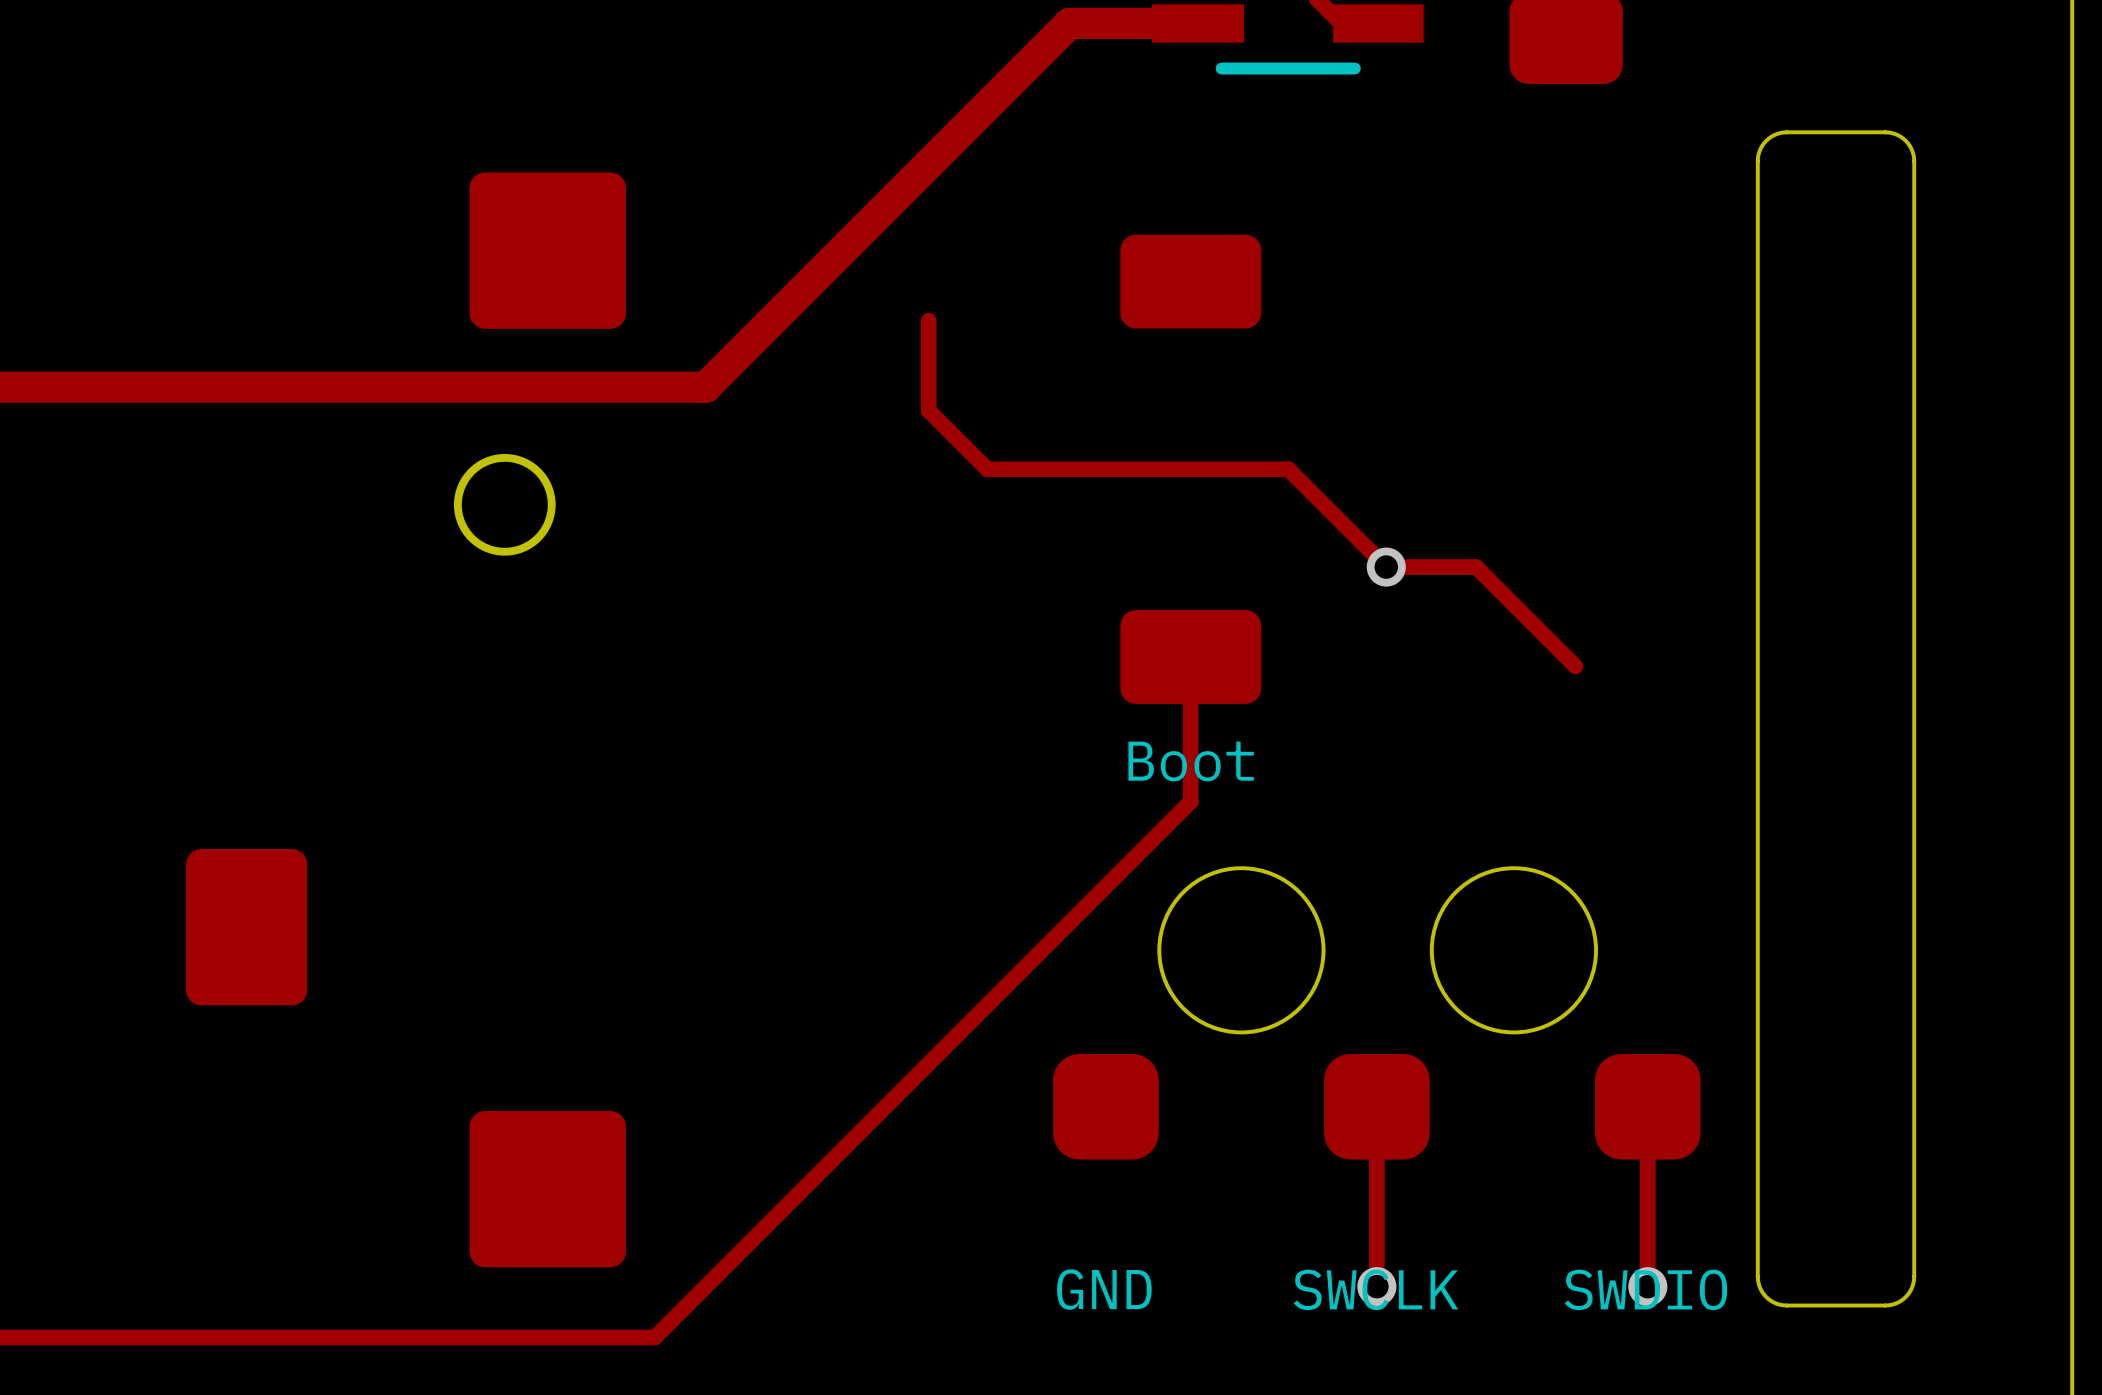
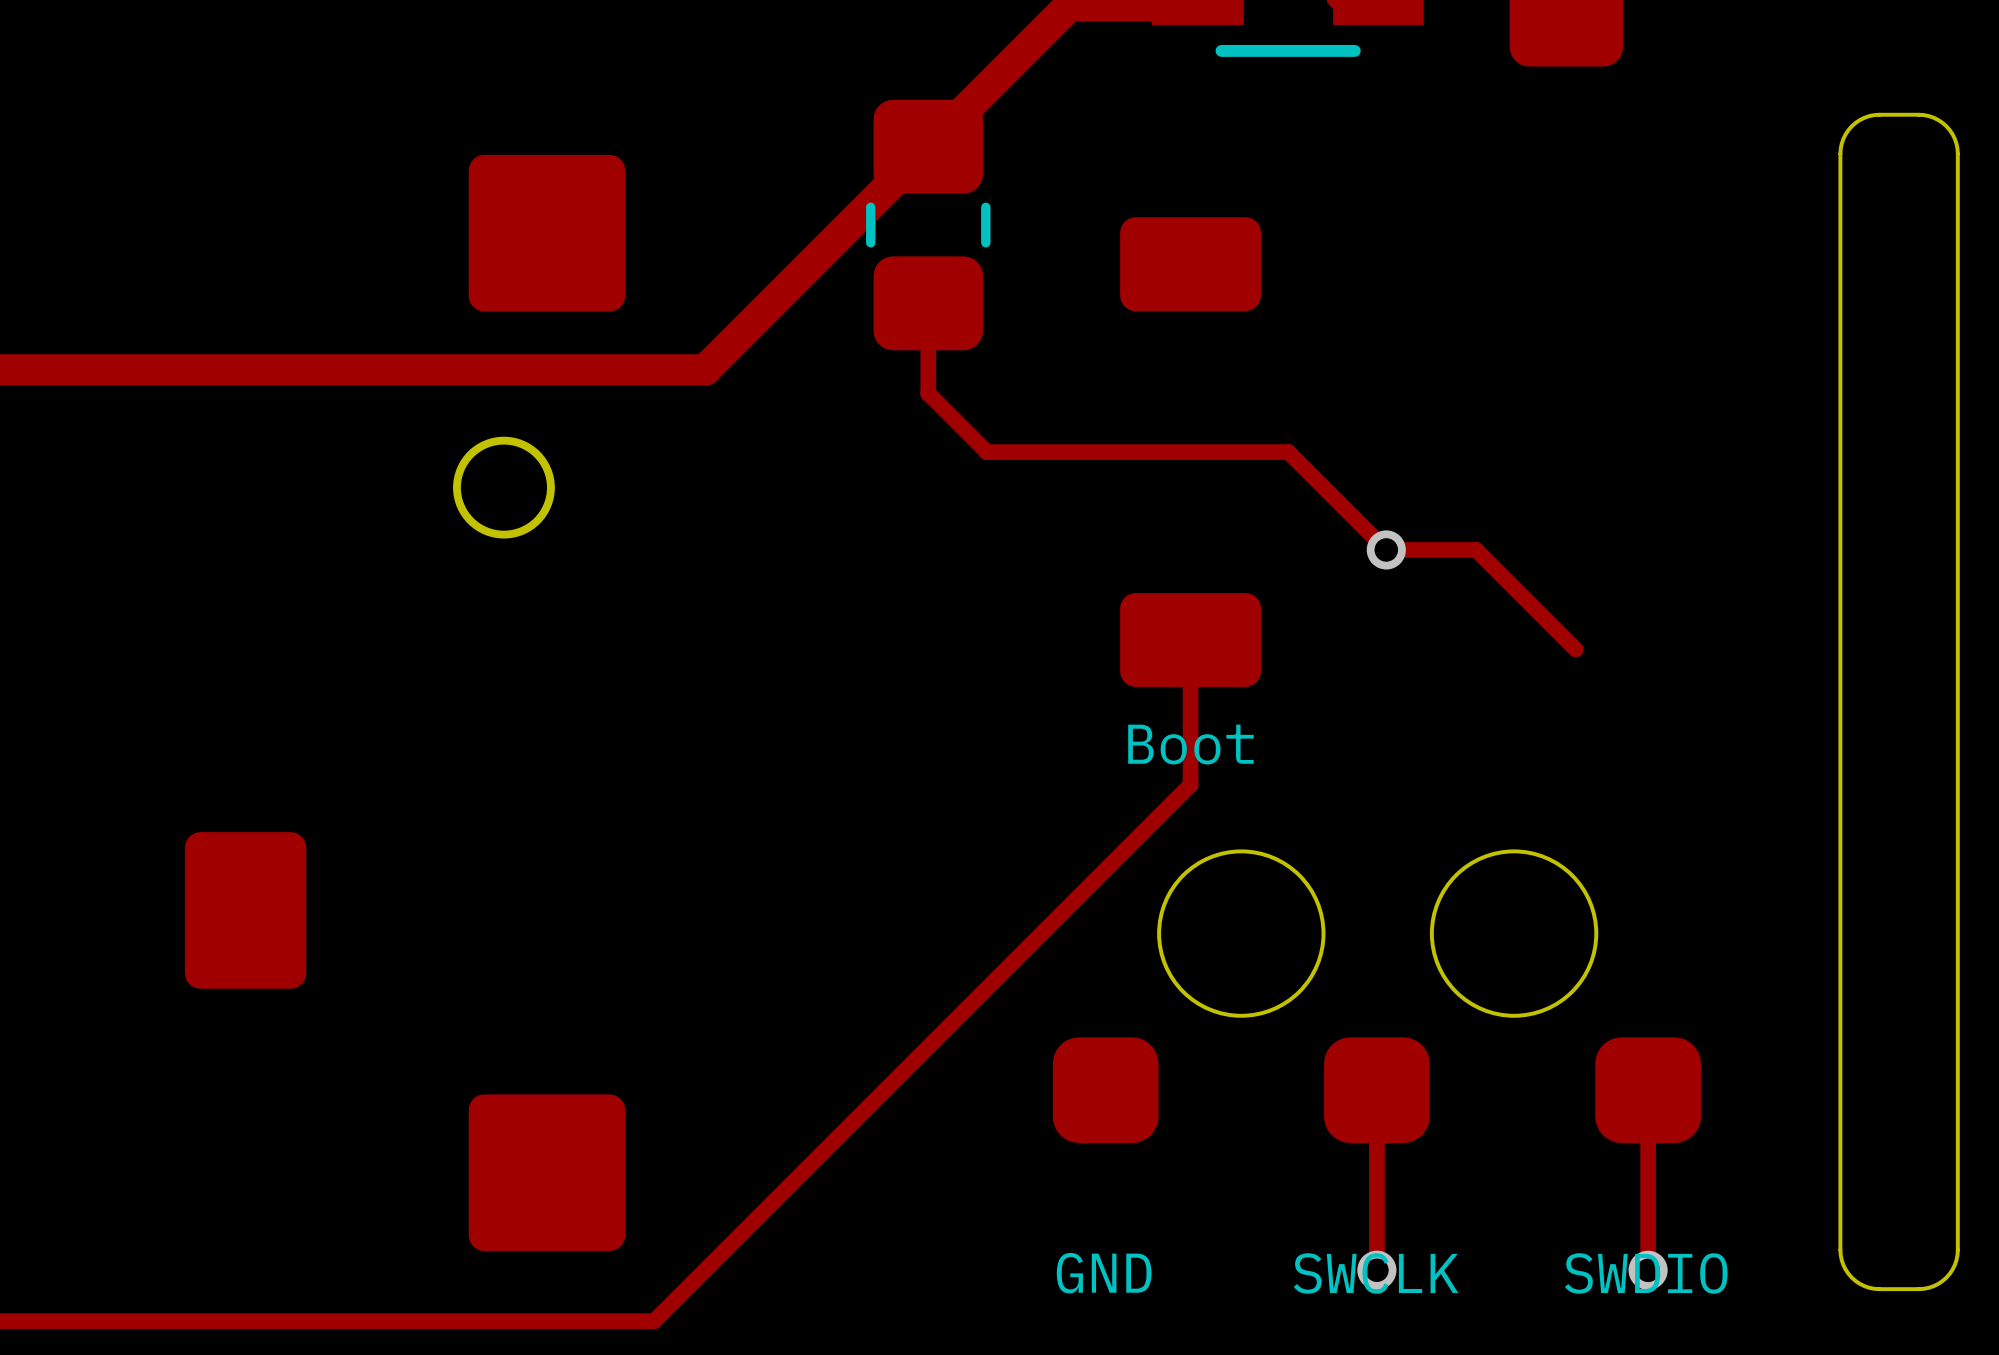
board edge: (1879, 132) (1780, 133) (1771, 136) (1764, 143) (1759, 151) (1757, 161) (1757, 1279) (1760, 1289) (1766, 1297) (1780, 1304) (1879, 1305) -> (1879, 114) (1864, 117) (1851, 126) (1843, 138) (1840, 153) (1840, 1250) (1843, 1264) (1851, 1277) (1864, 1286) (1879, 1289)
board edge: (1885, 132) (1894, 133) (1905, 140) (1911, 148) (1914, 161) (1914, 1276) (1912, 1286) (1905, 1297) (1897, 1302) (1885, 1305) -> (1885, 114) (1923, 115) (1938, 120) (1952, 134) (1957, 153) (1957, 1250) (1952, 1269) (1938, 1283) (1923, 1288) (1885, 1289)
part: none -> (928, 225)

